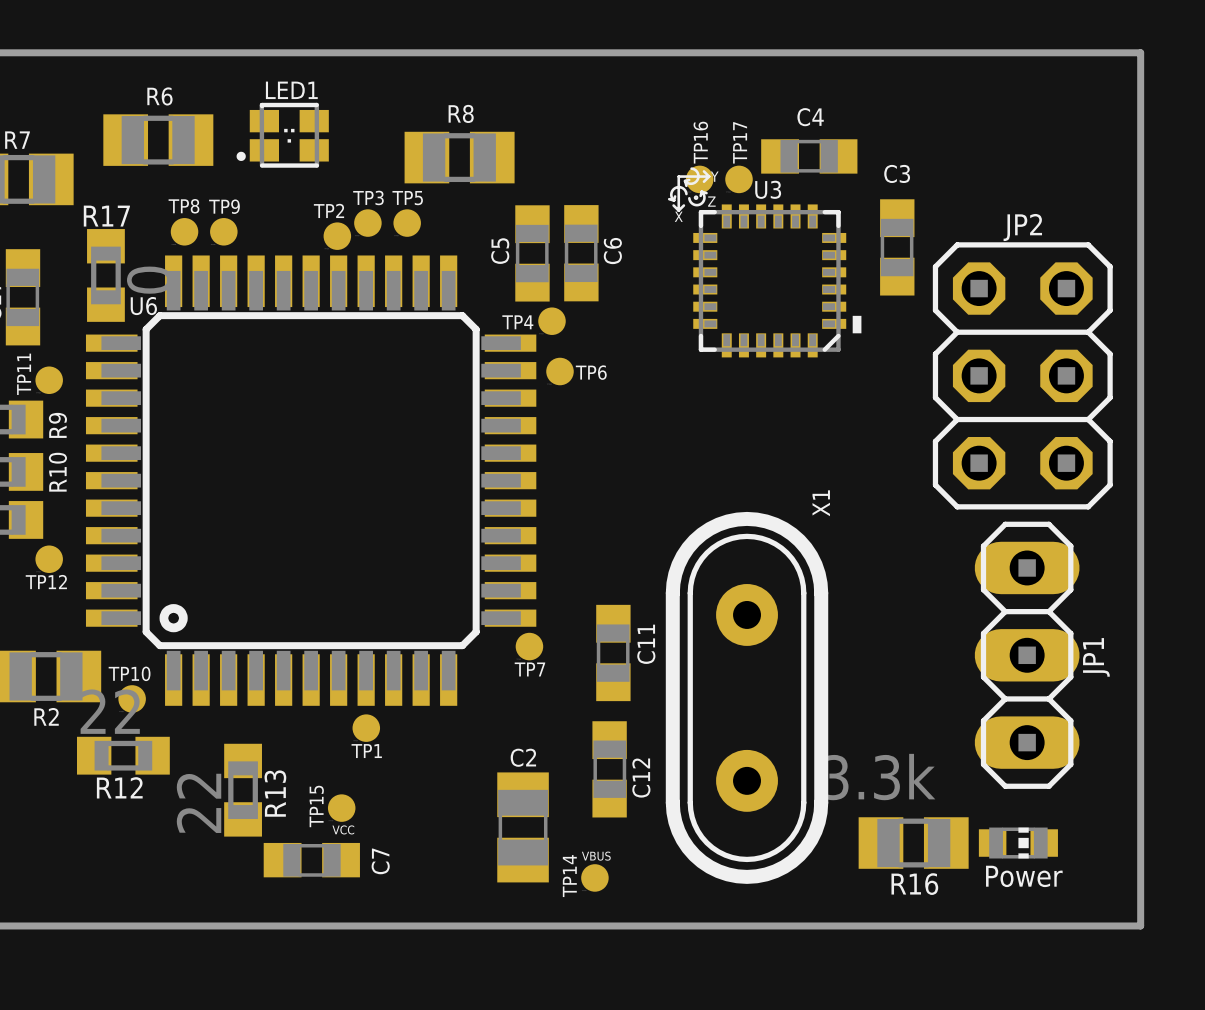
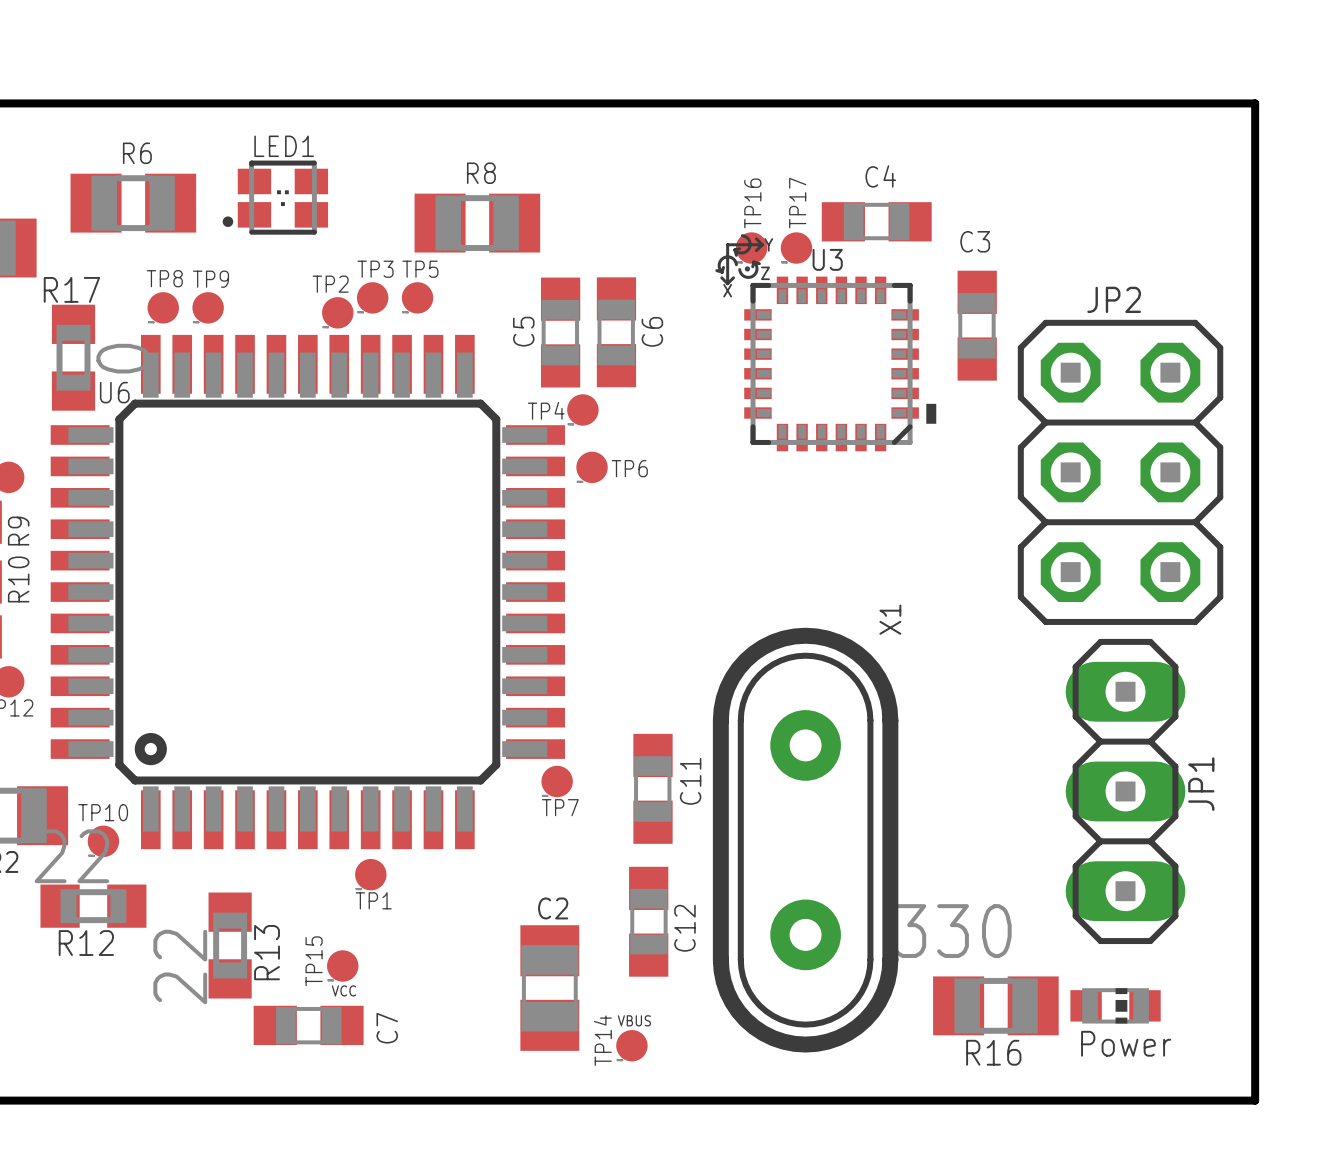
R16 value: 3.3k (878, 777) -> 330 (953, 931)

